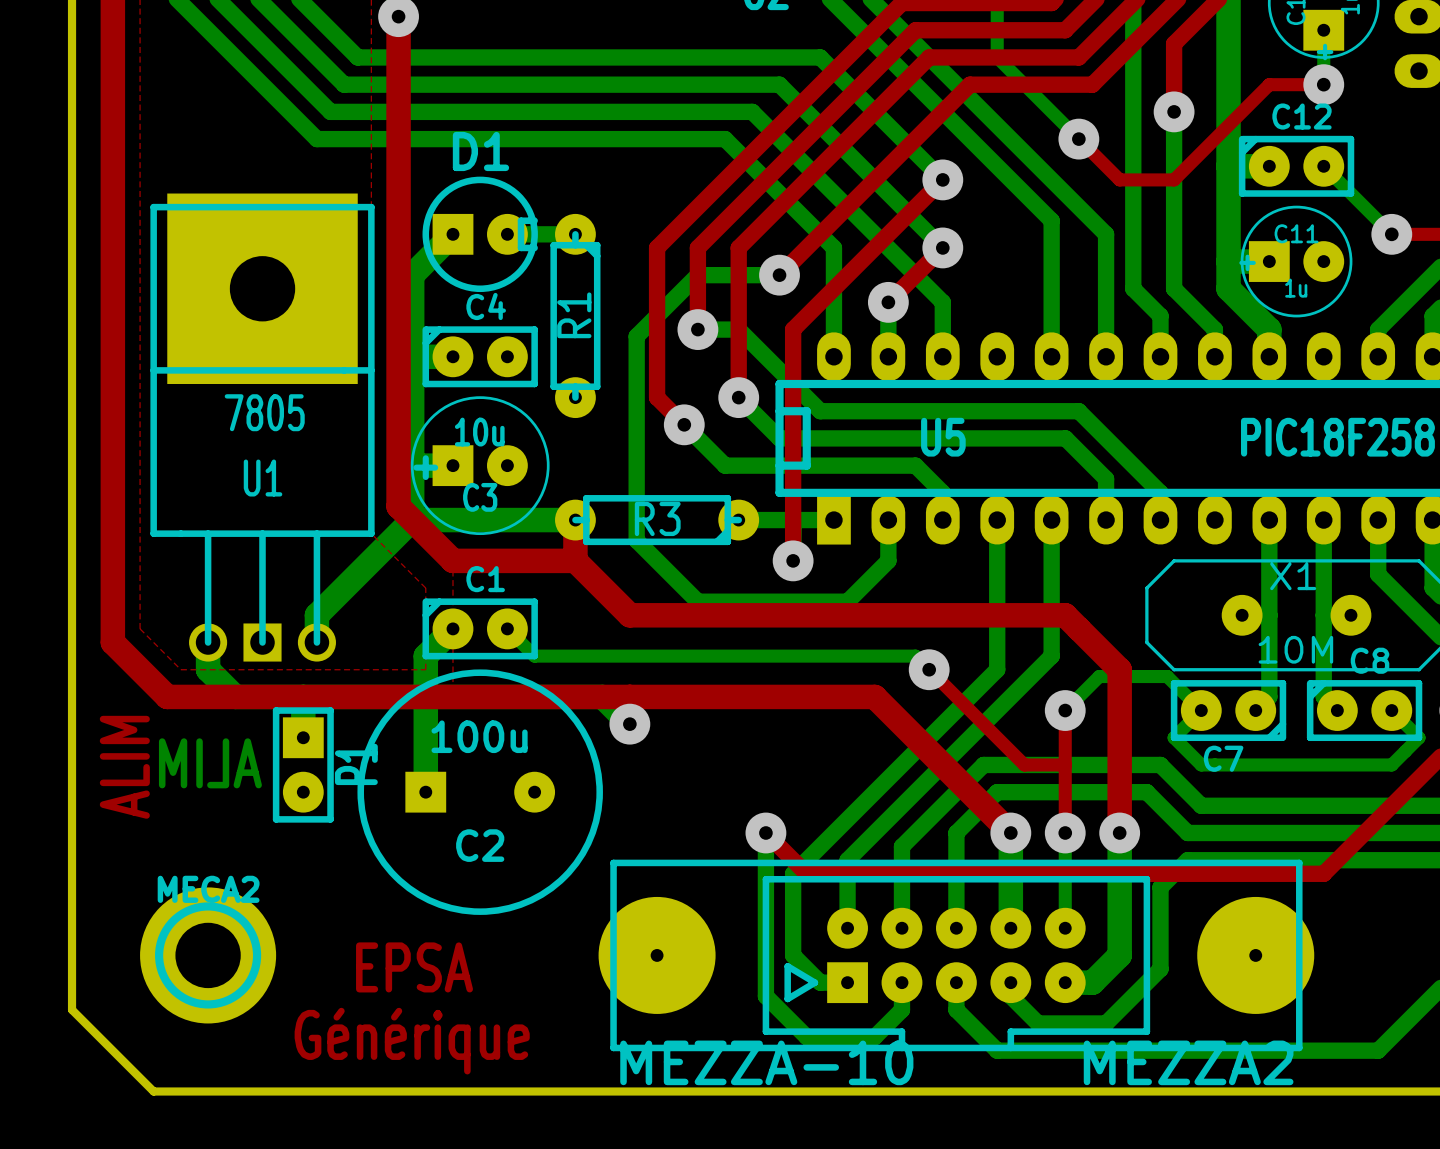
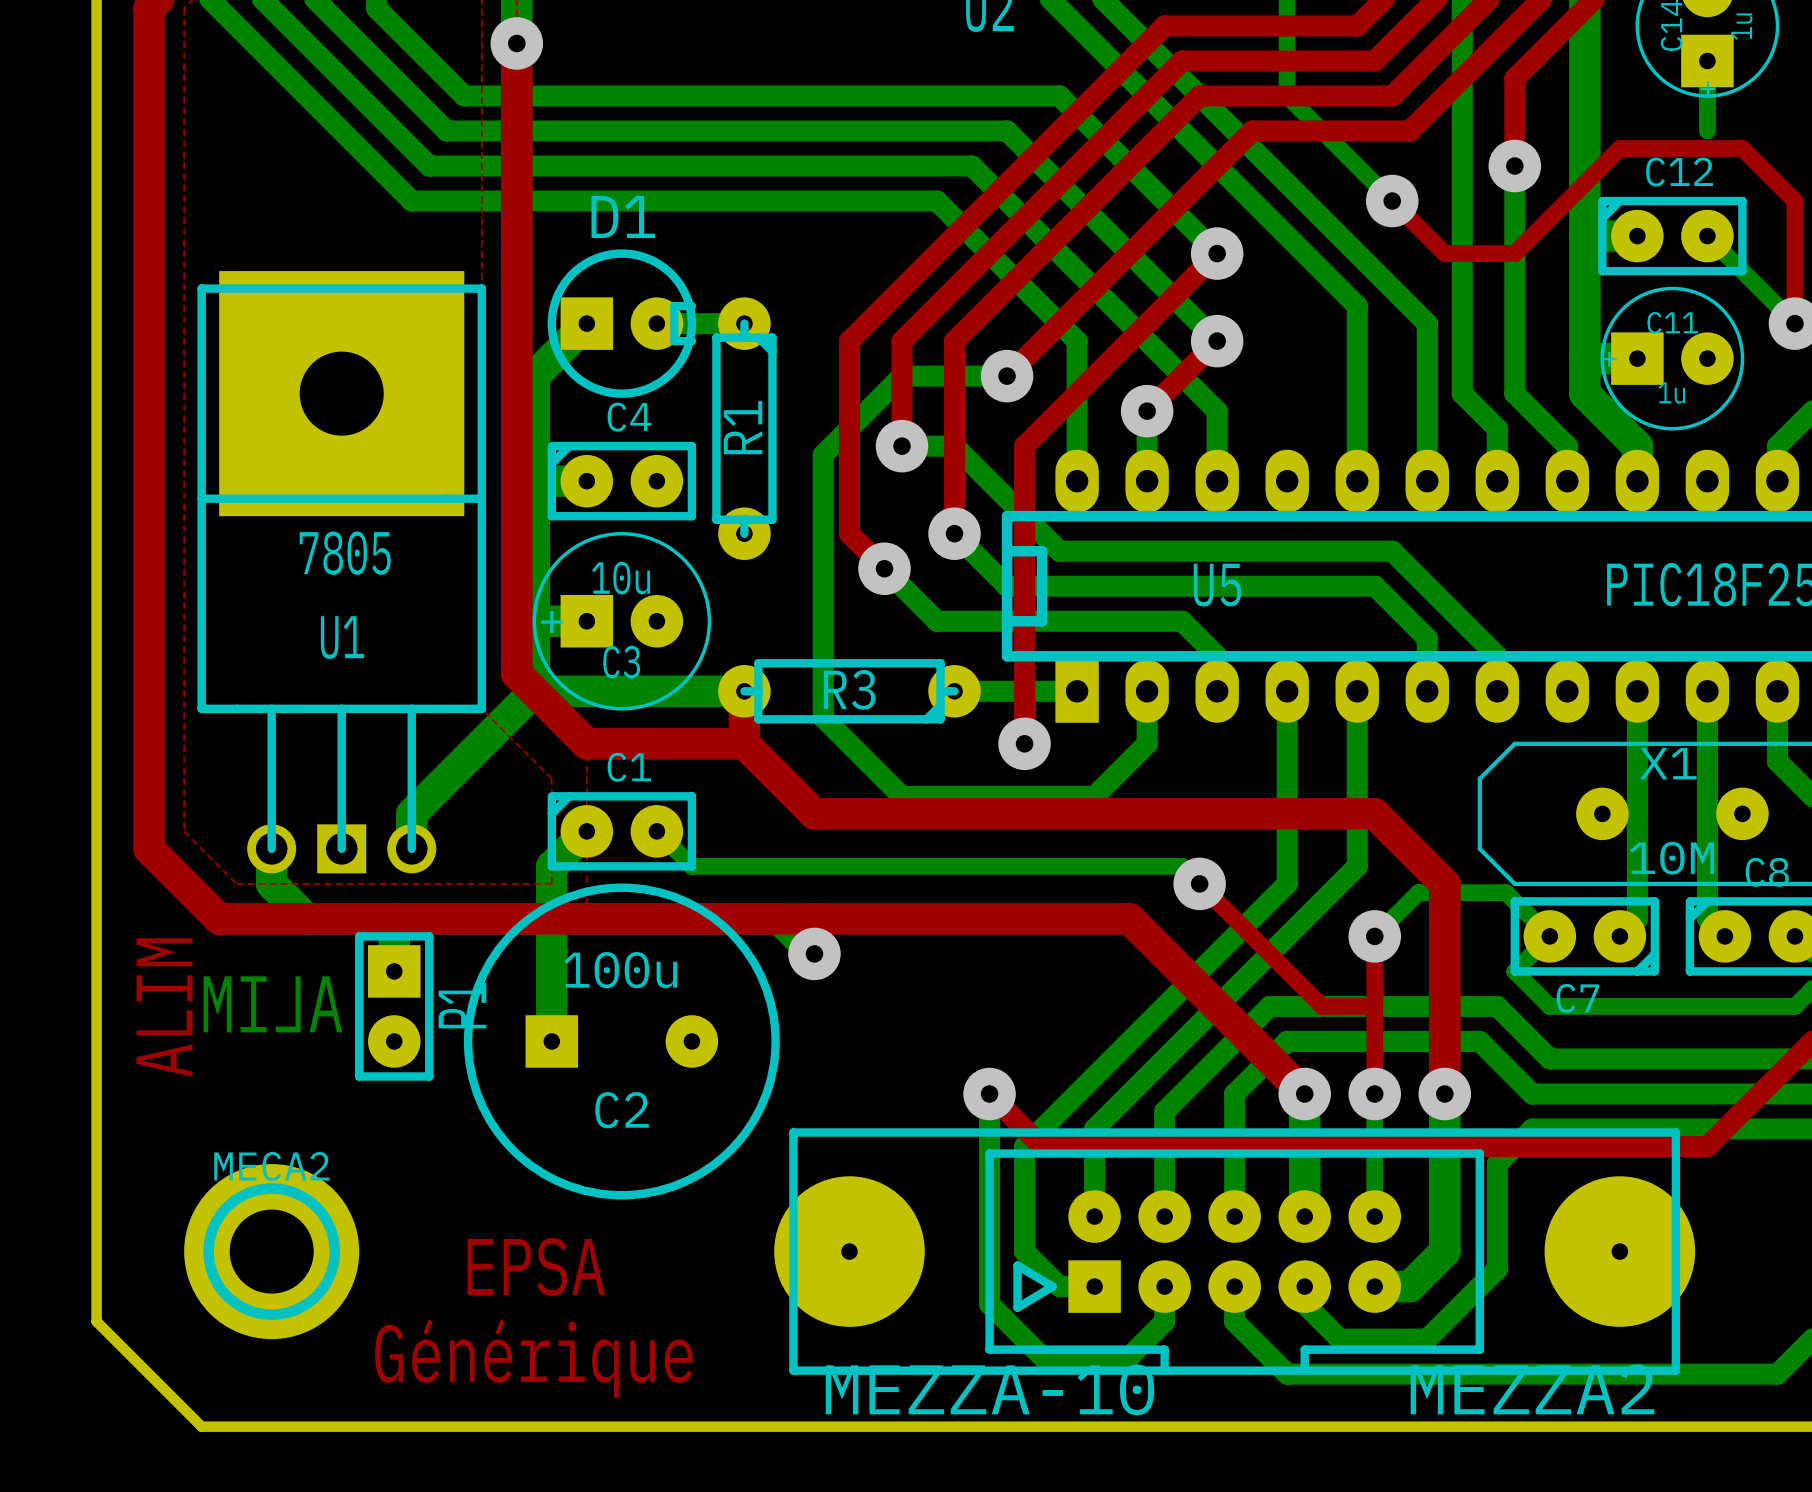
top track: (1323, 84) (1269, 84) (1255, 98) -> (1794, 323) (1794, 201) (1742, 148) (1619, 148)
via: (1323, 84) -> none

